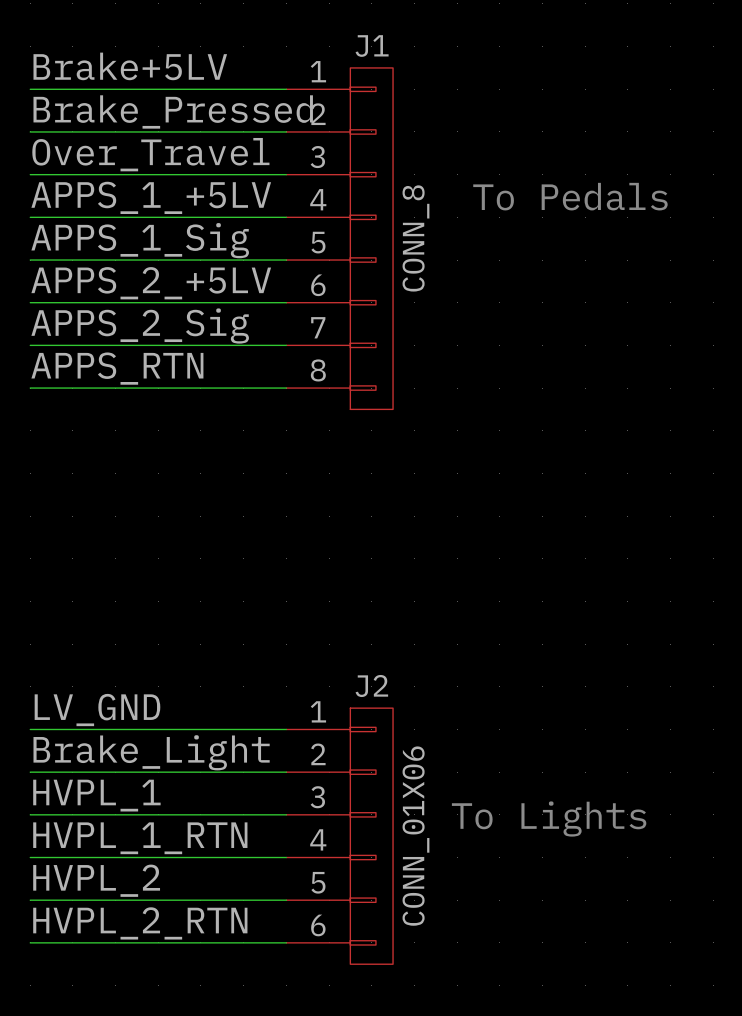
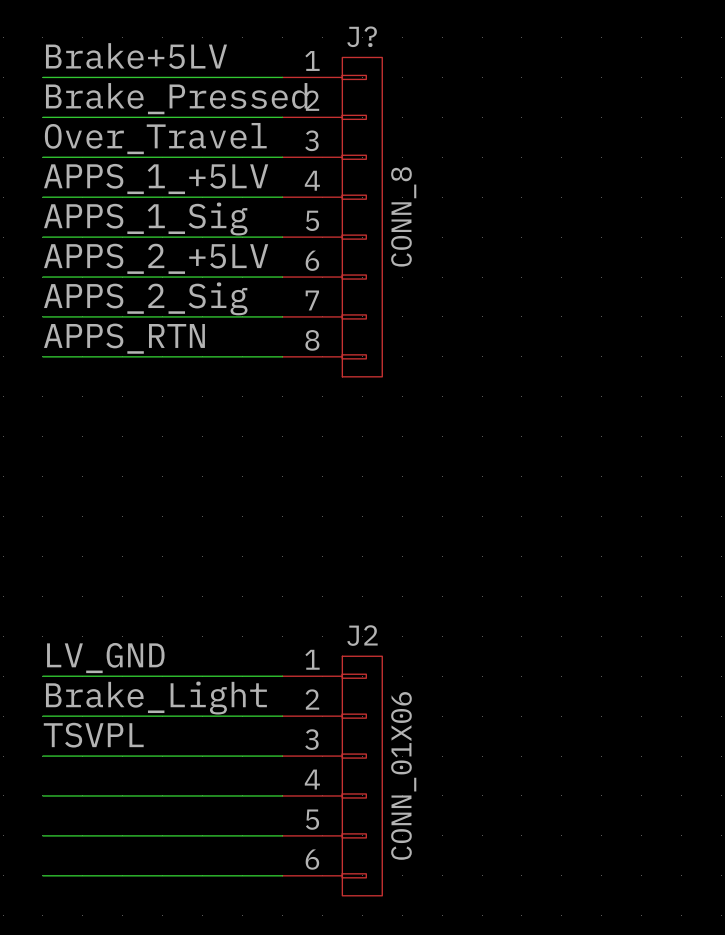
J1 name: J1 (372, 46) -> J? (362, 36)
text: To Pedals (570, 196) -> none
label: HVPL_1 (96, 795) -> TSVPL (93, 735)
text: To Lights (549, 819) -> none
label: HVPL_1_RTN (140, 838) -> none
label: HVPL_2 (96, 880) -> none
label: HVPL_2_RTN (140, 923) -> none

